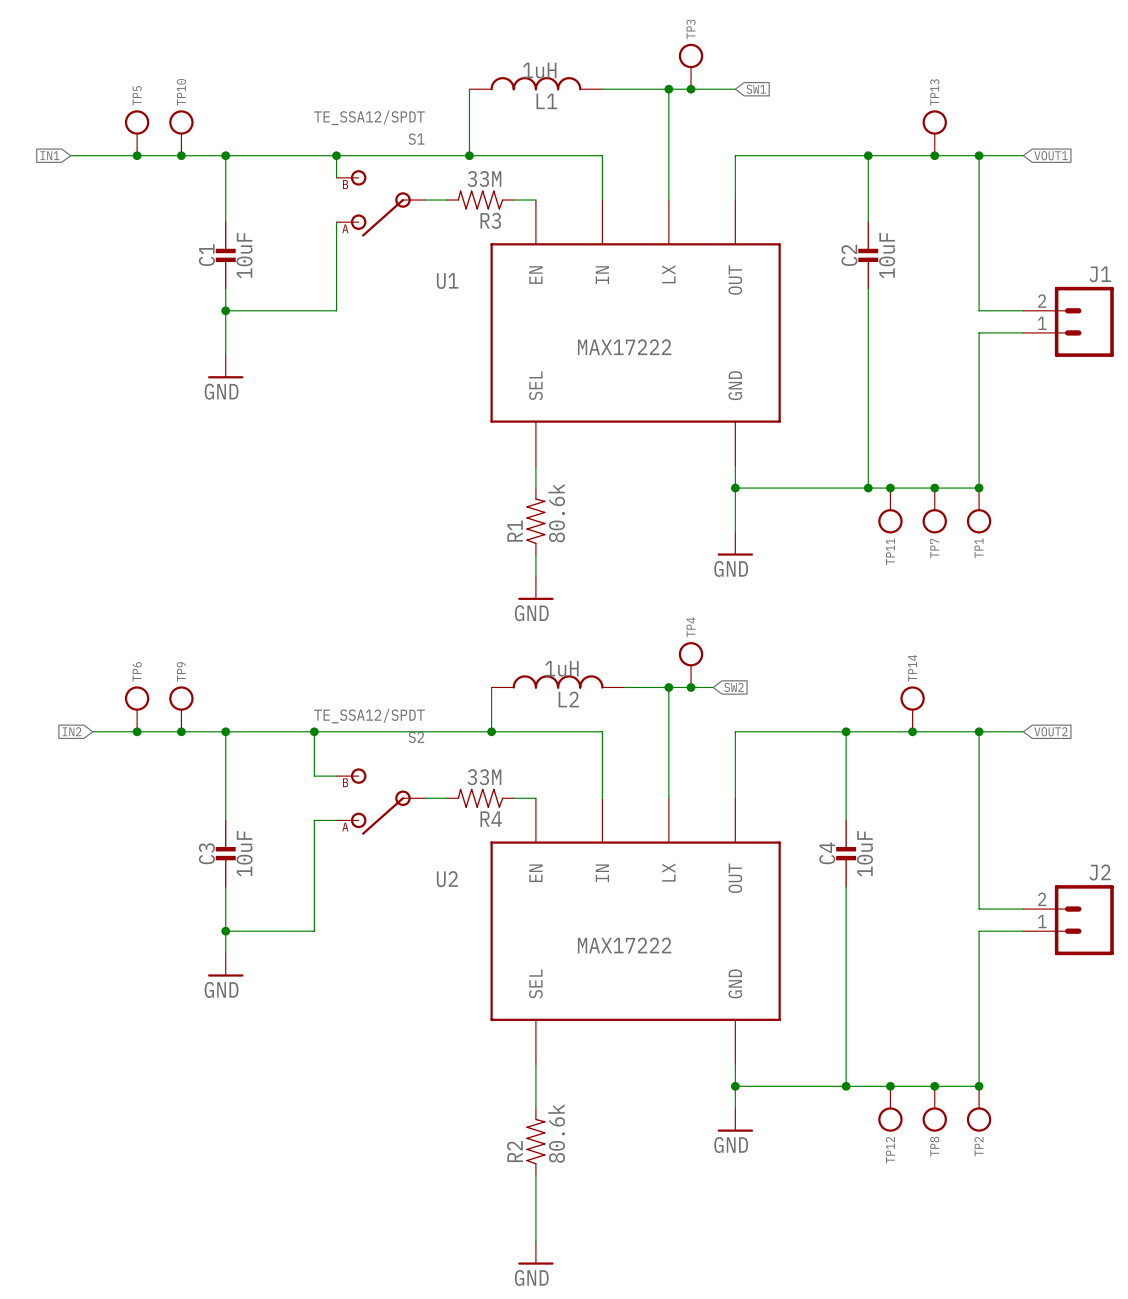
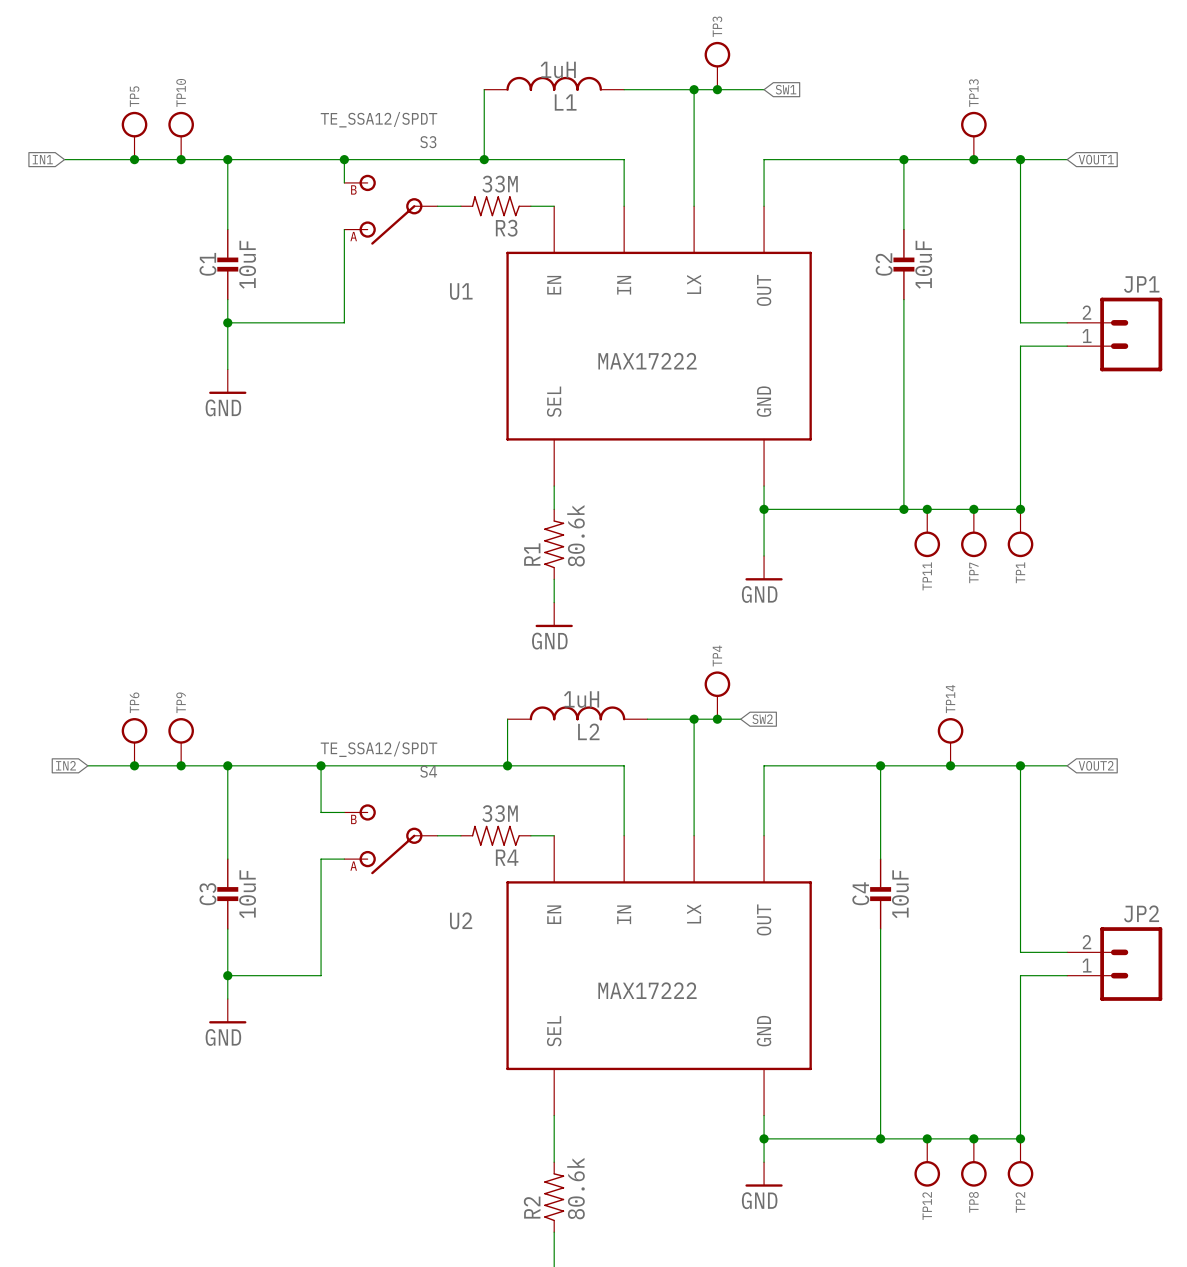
S1 name: S1 (416, 139) -> S3 (428, 142)
J1 name: J1 (1100, 274) -> JP1 (1141, 284)
S2 name: S2 (416, 737) -> S4 (428, 771)
J2 name: J2 (1100, 872) -> JP2 (1141, 913)

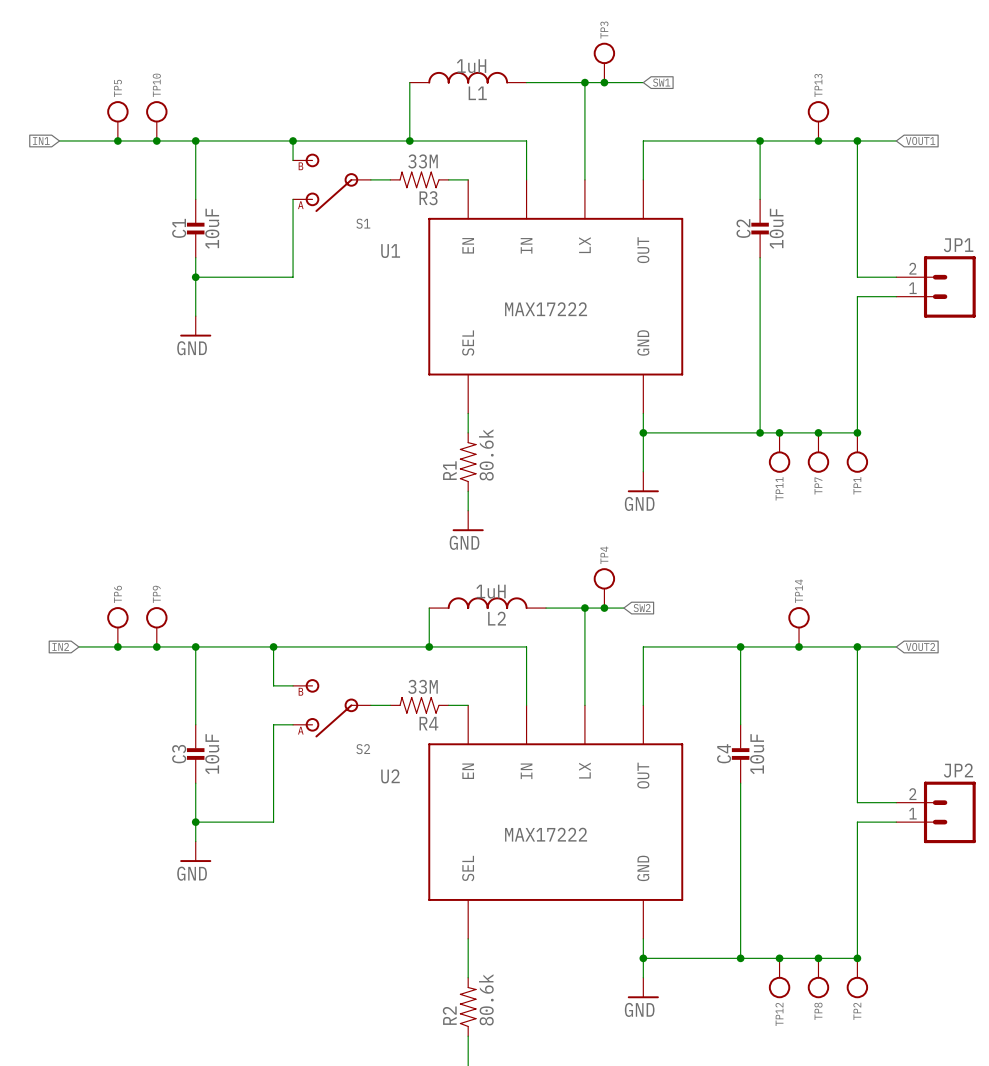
S3 value: TE_SSA12/SPDT (378, 119) -> none
S3 name: S3 (428, 142) -> S1 (363, 223)
S4 value: TE_SSA12/SPDT (378, 749) -> none
S4 name: S4 (428, 771) -> S2 (363, 749)

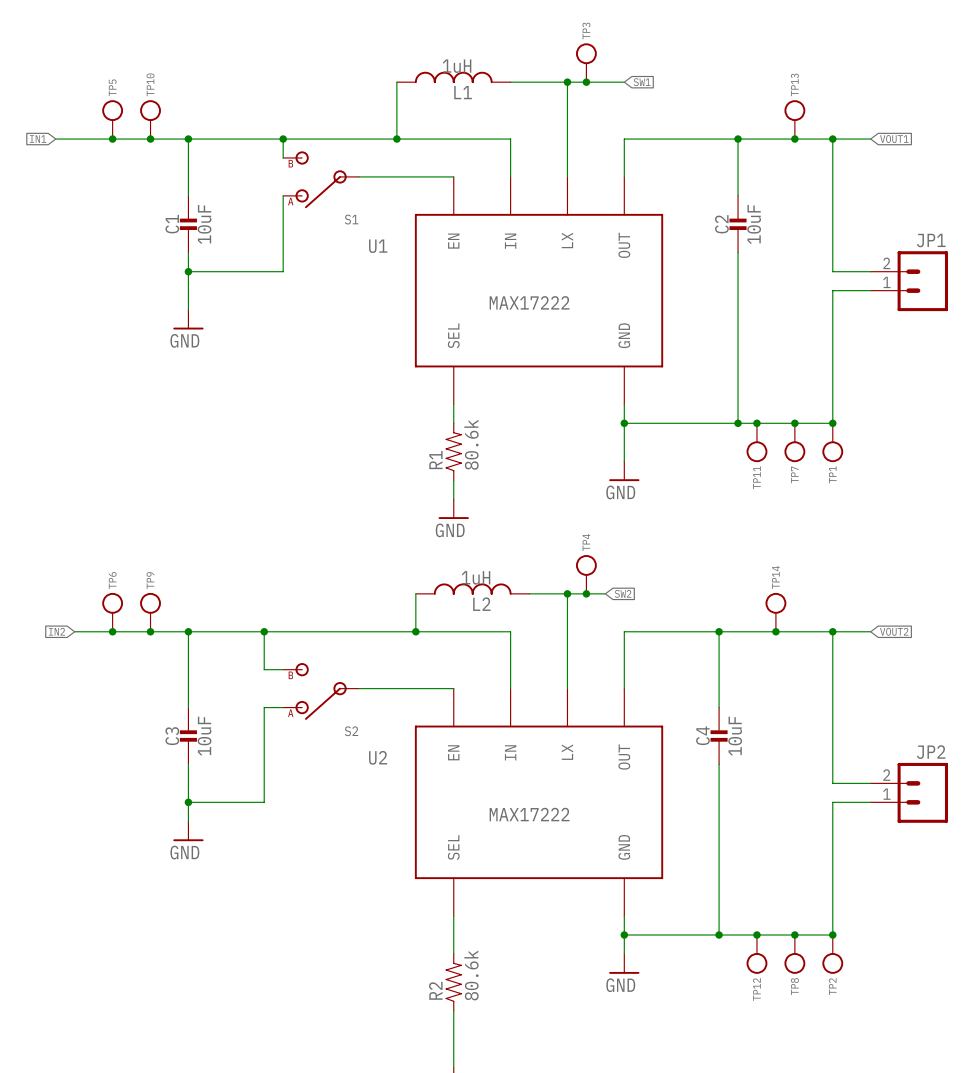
R3: 33M (419, 179) -> none
R4: 33M (419, 705) -> none

